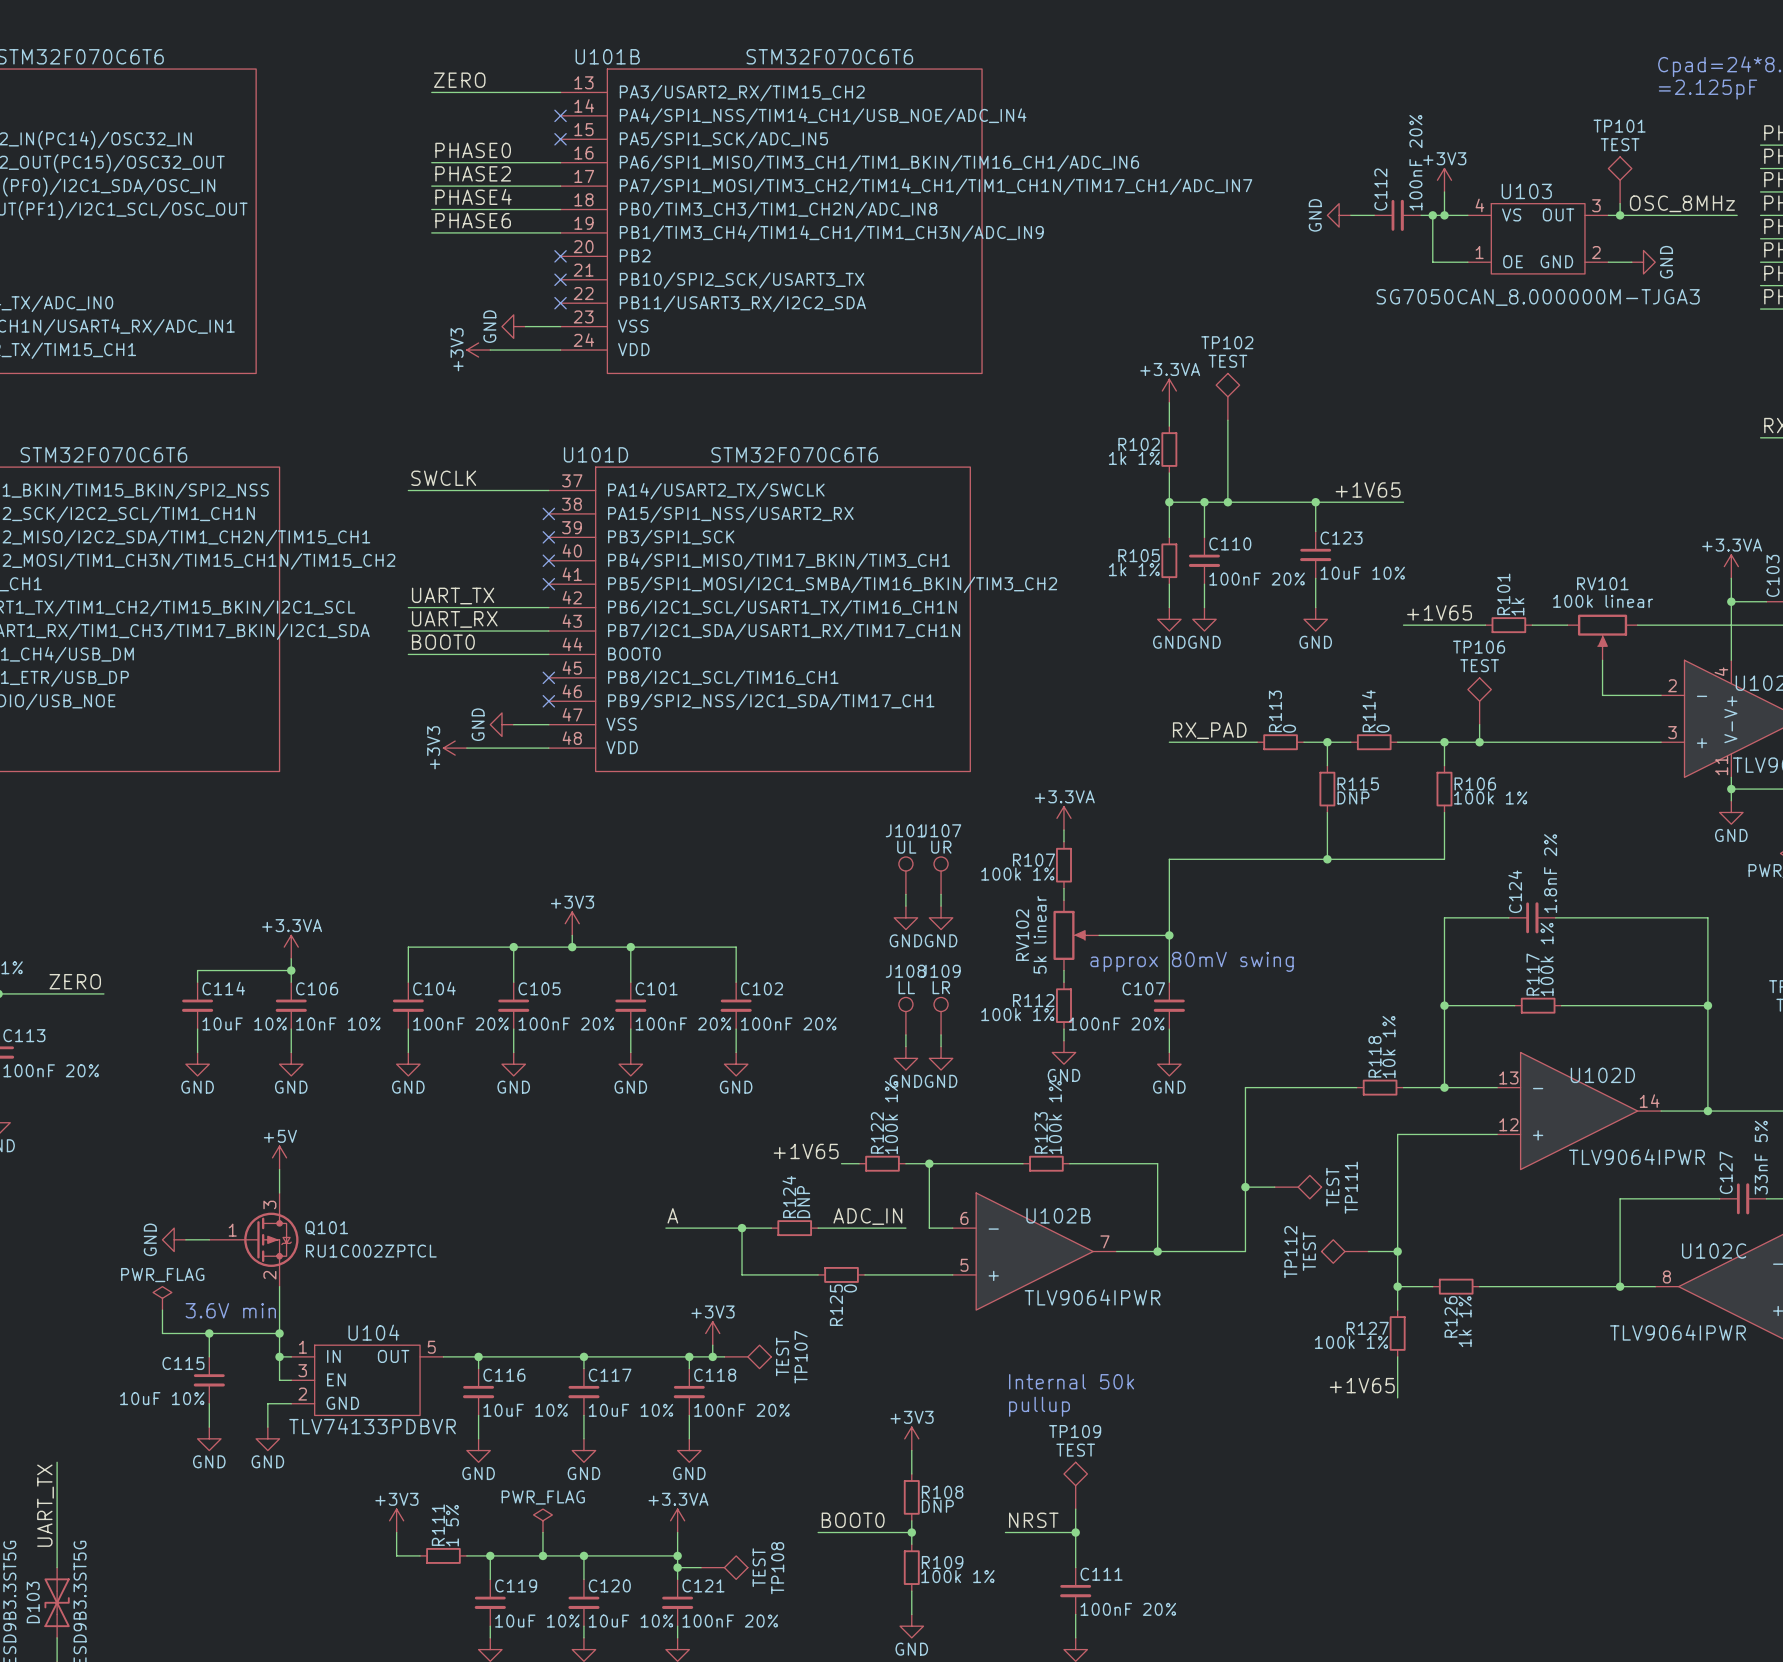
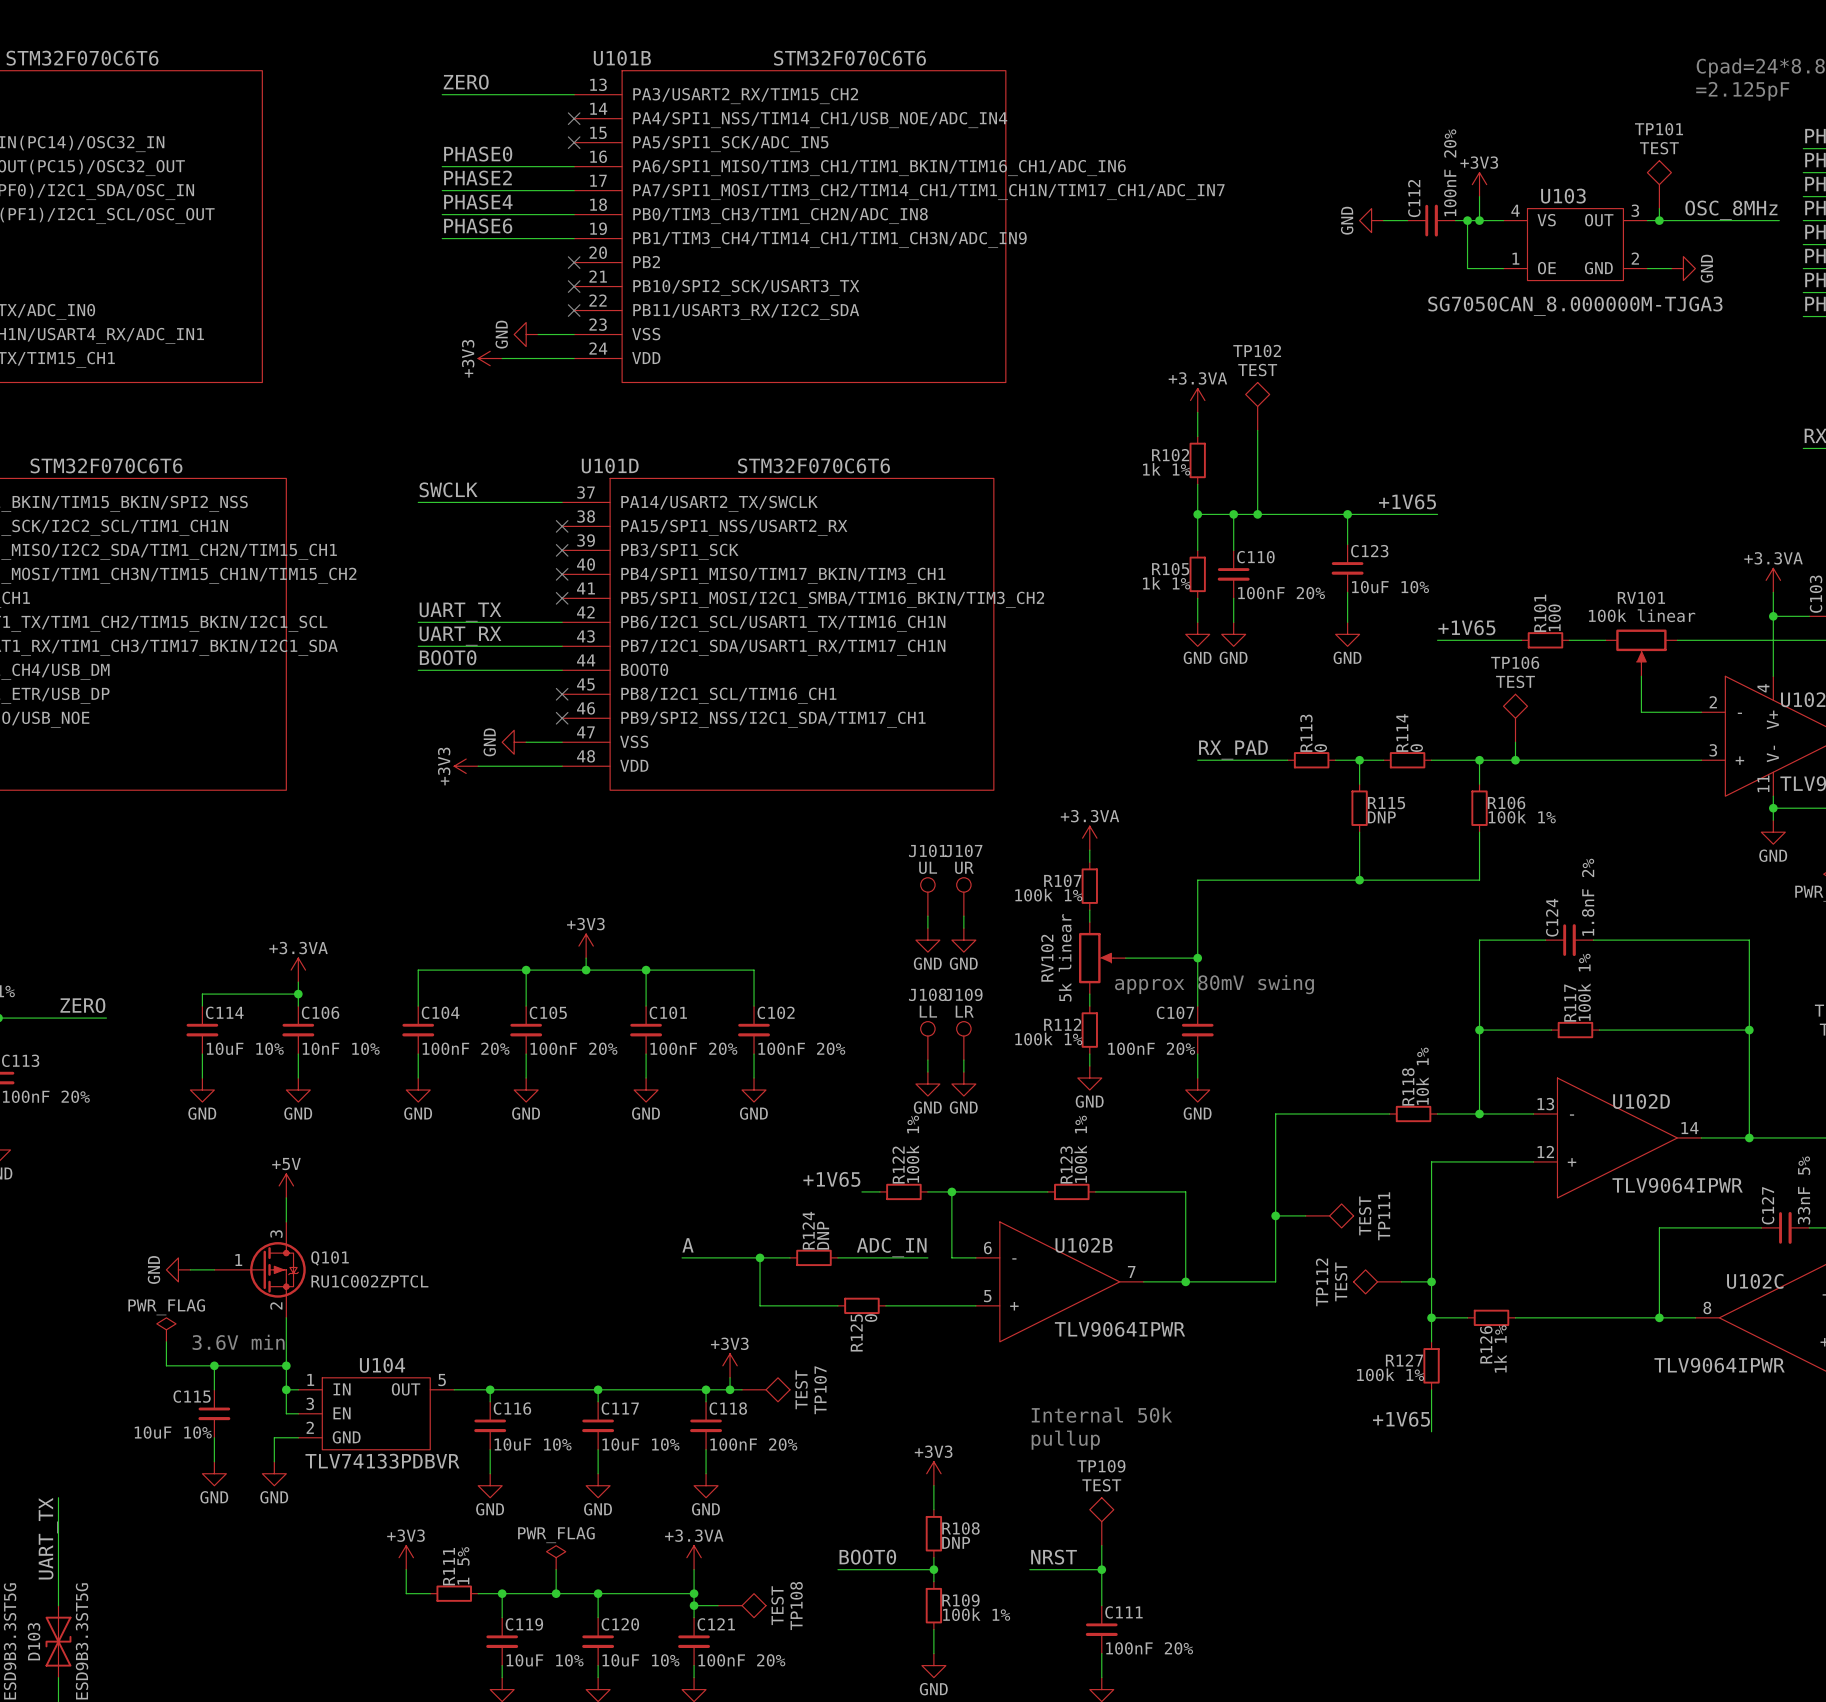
R101 value: 1k (1517, 606) -> 100 (1554, 617)

